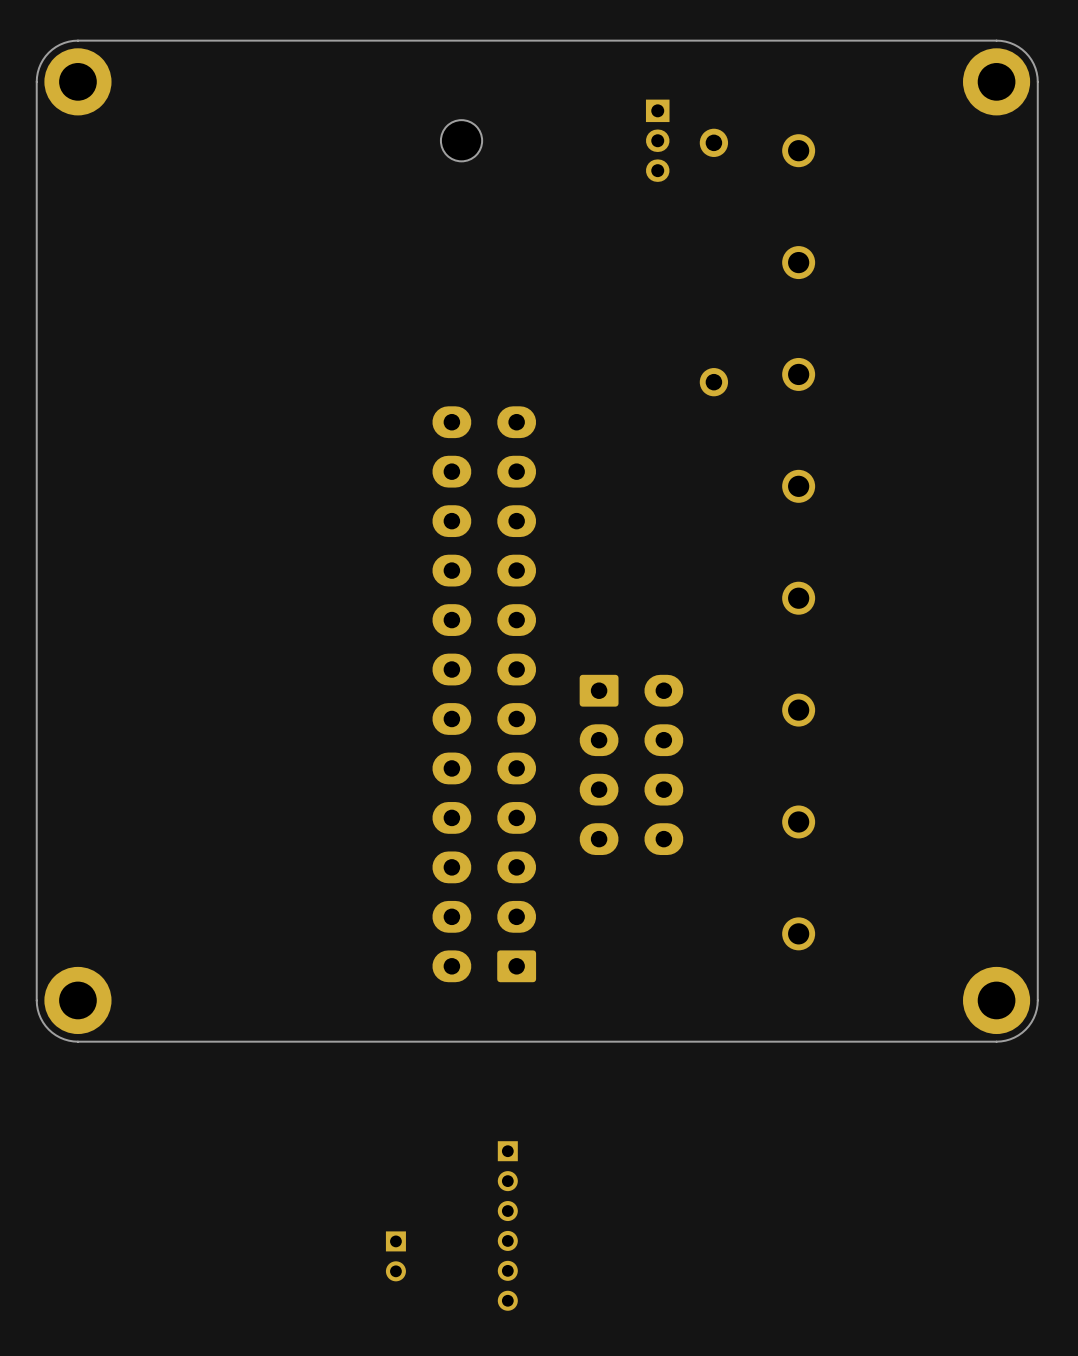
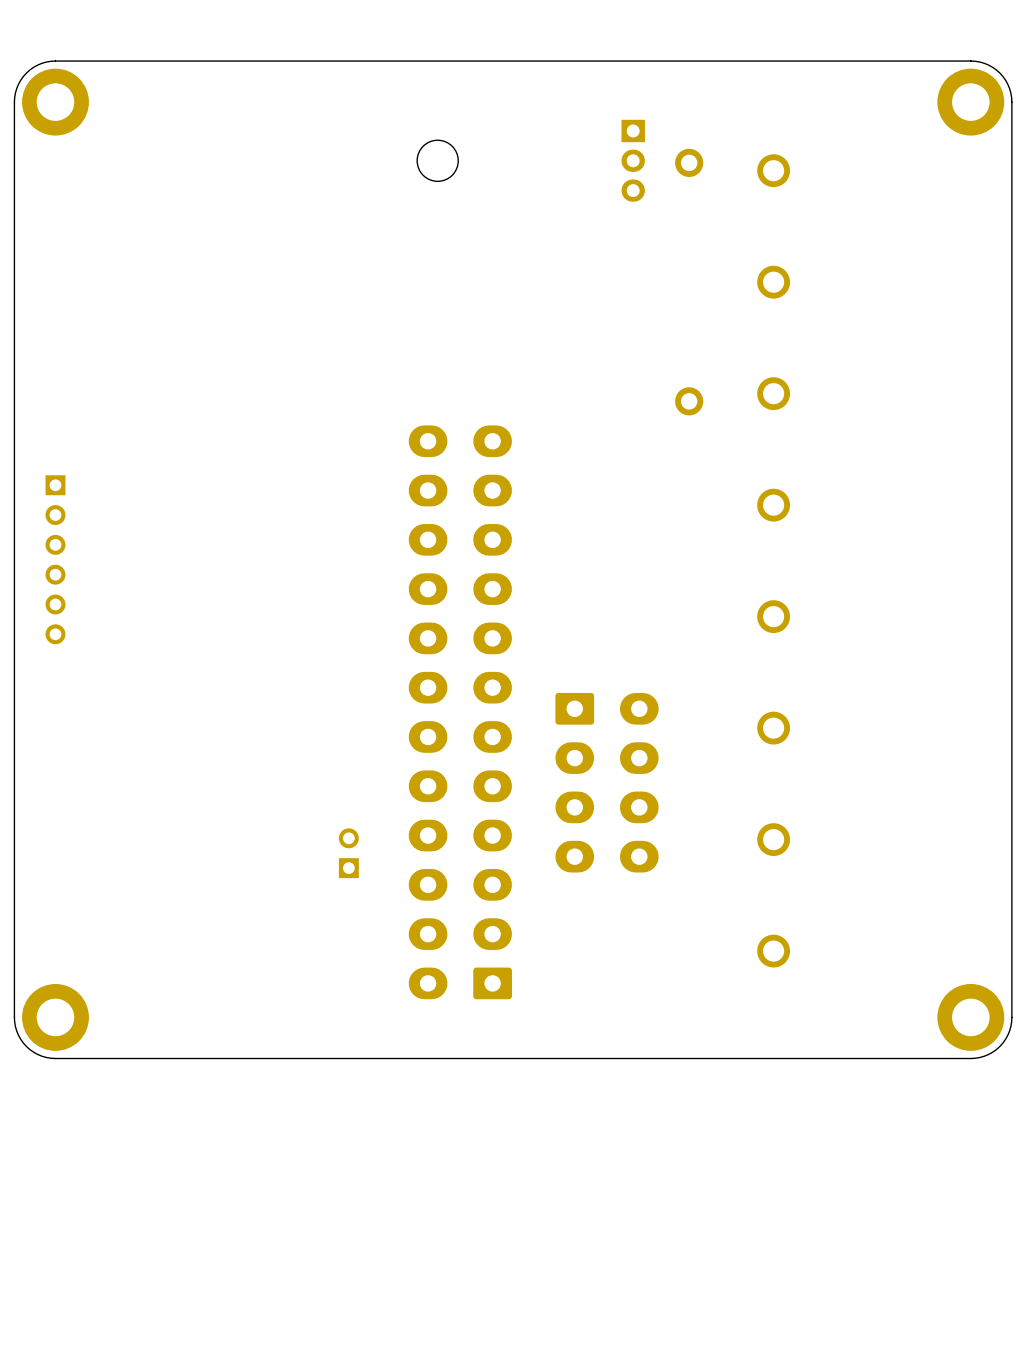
part: none -> (55, 559)
part: none -> (348, 853)
part: (507, 1225) -> none
part: (395, 1256) -> none

